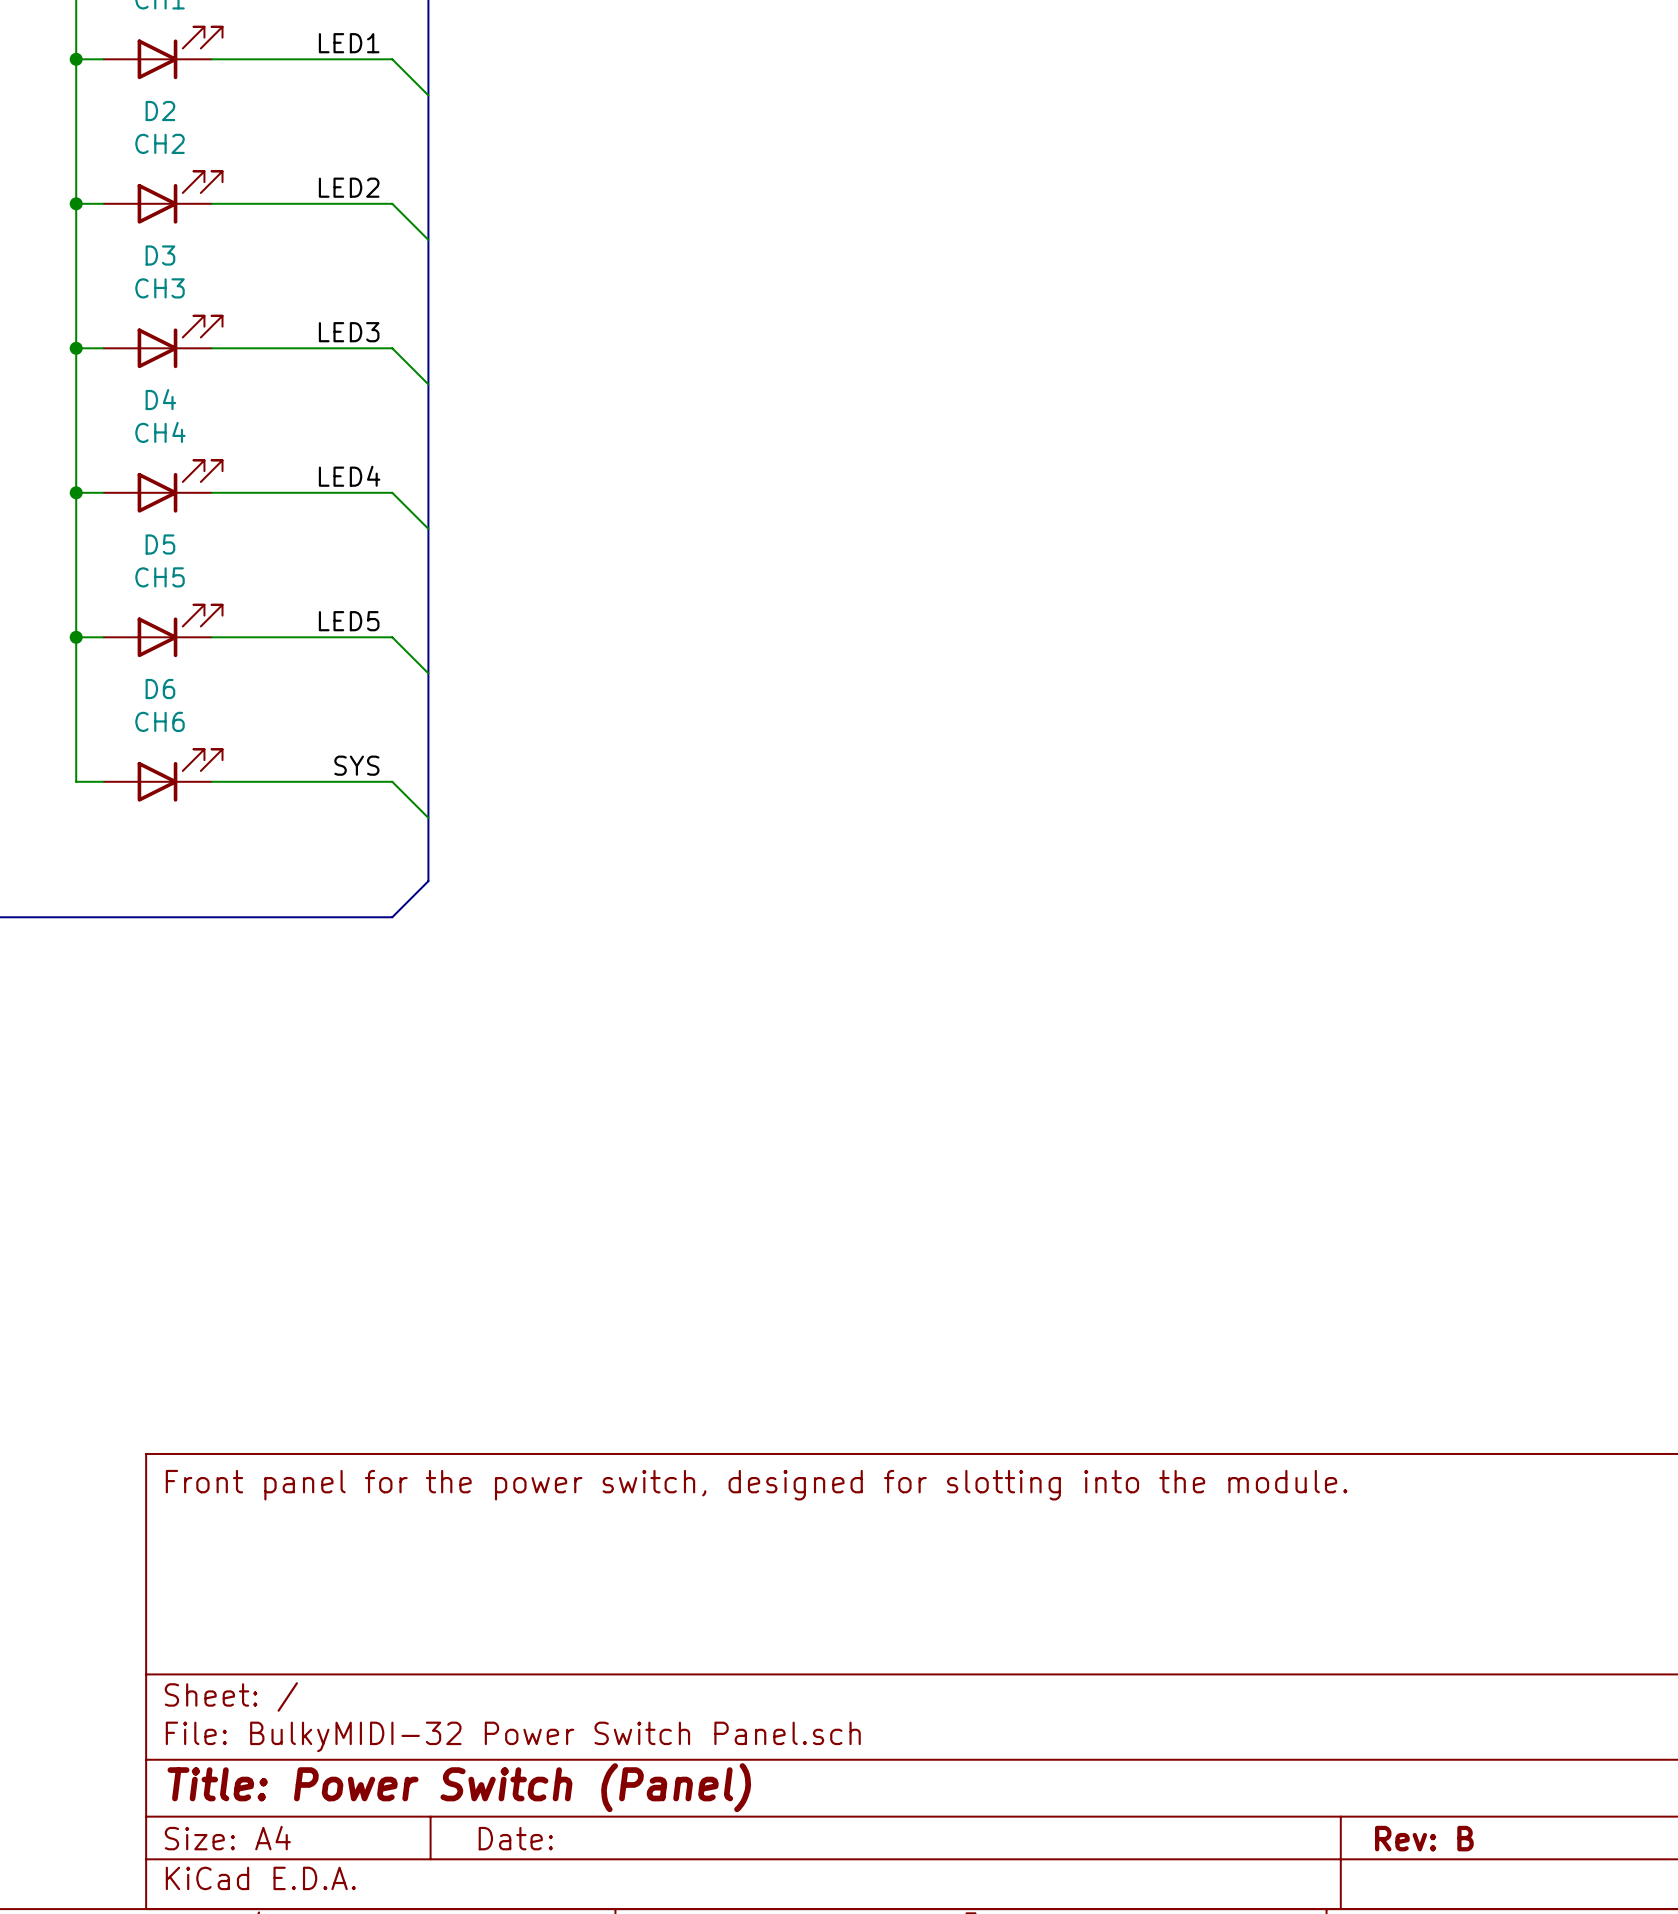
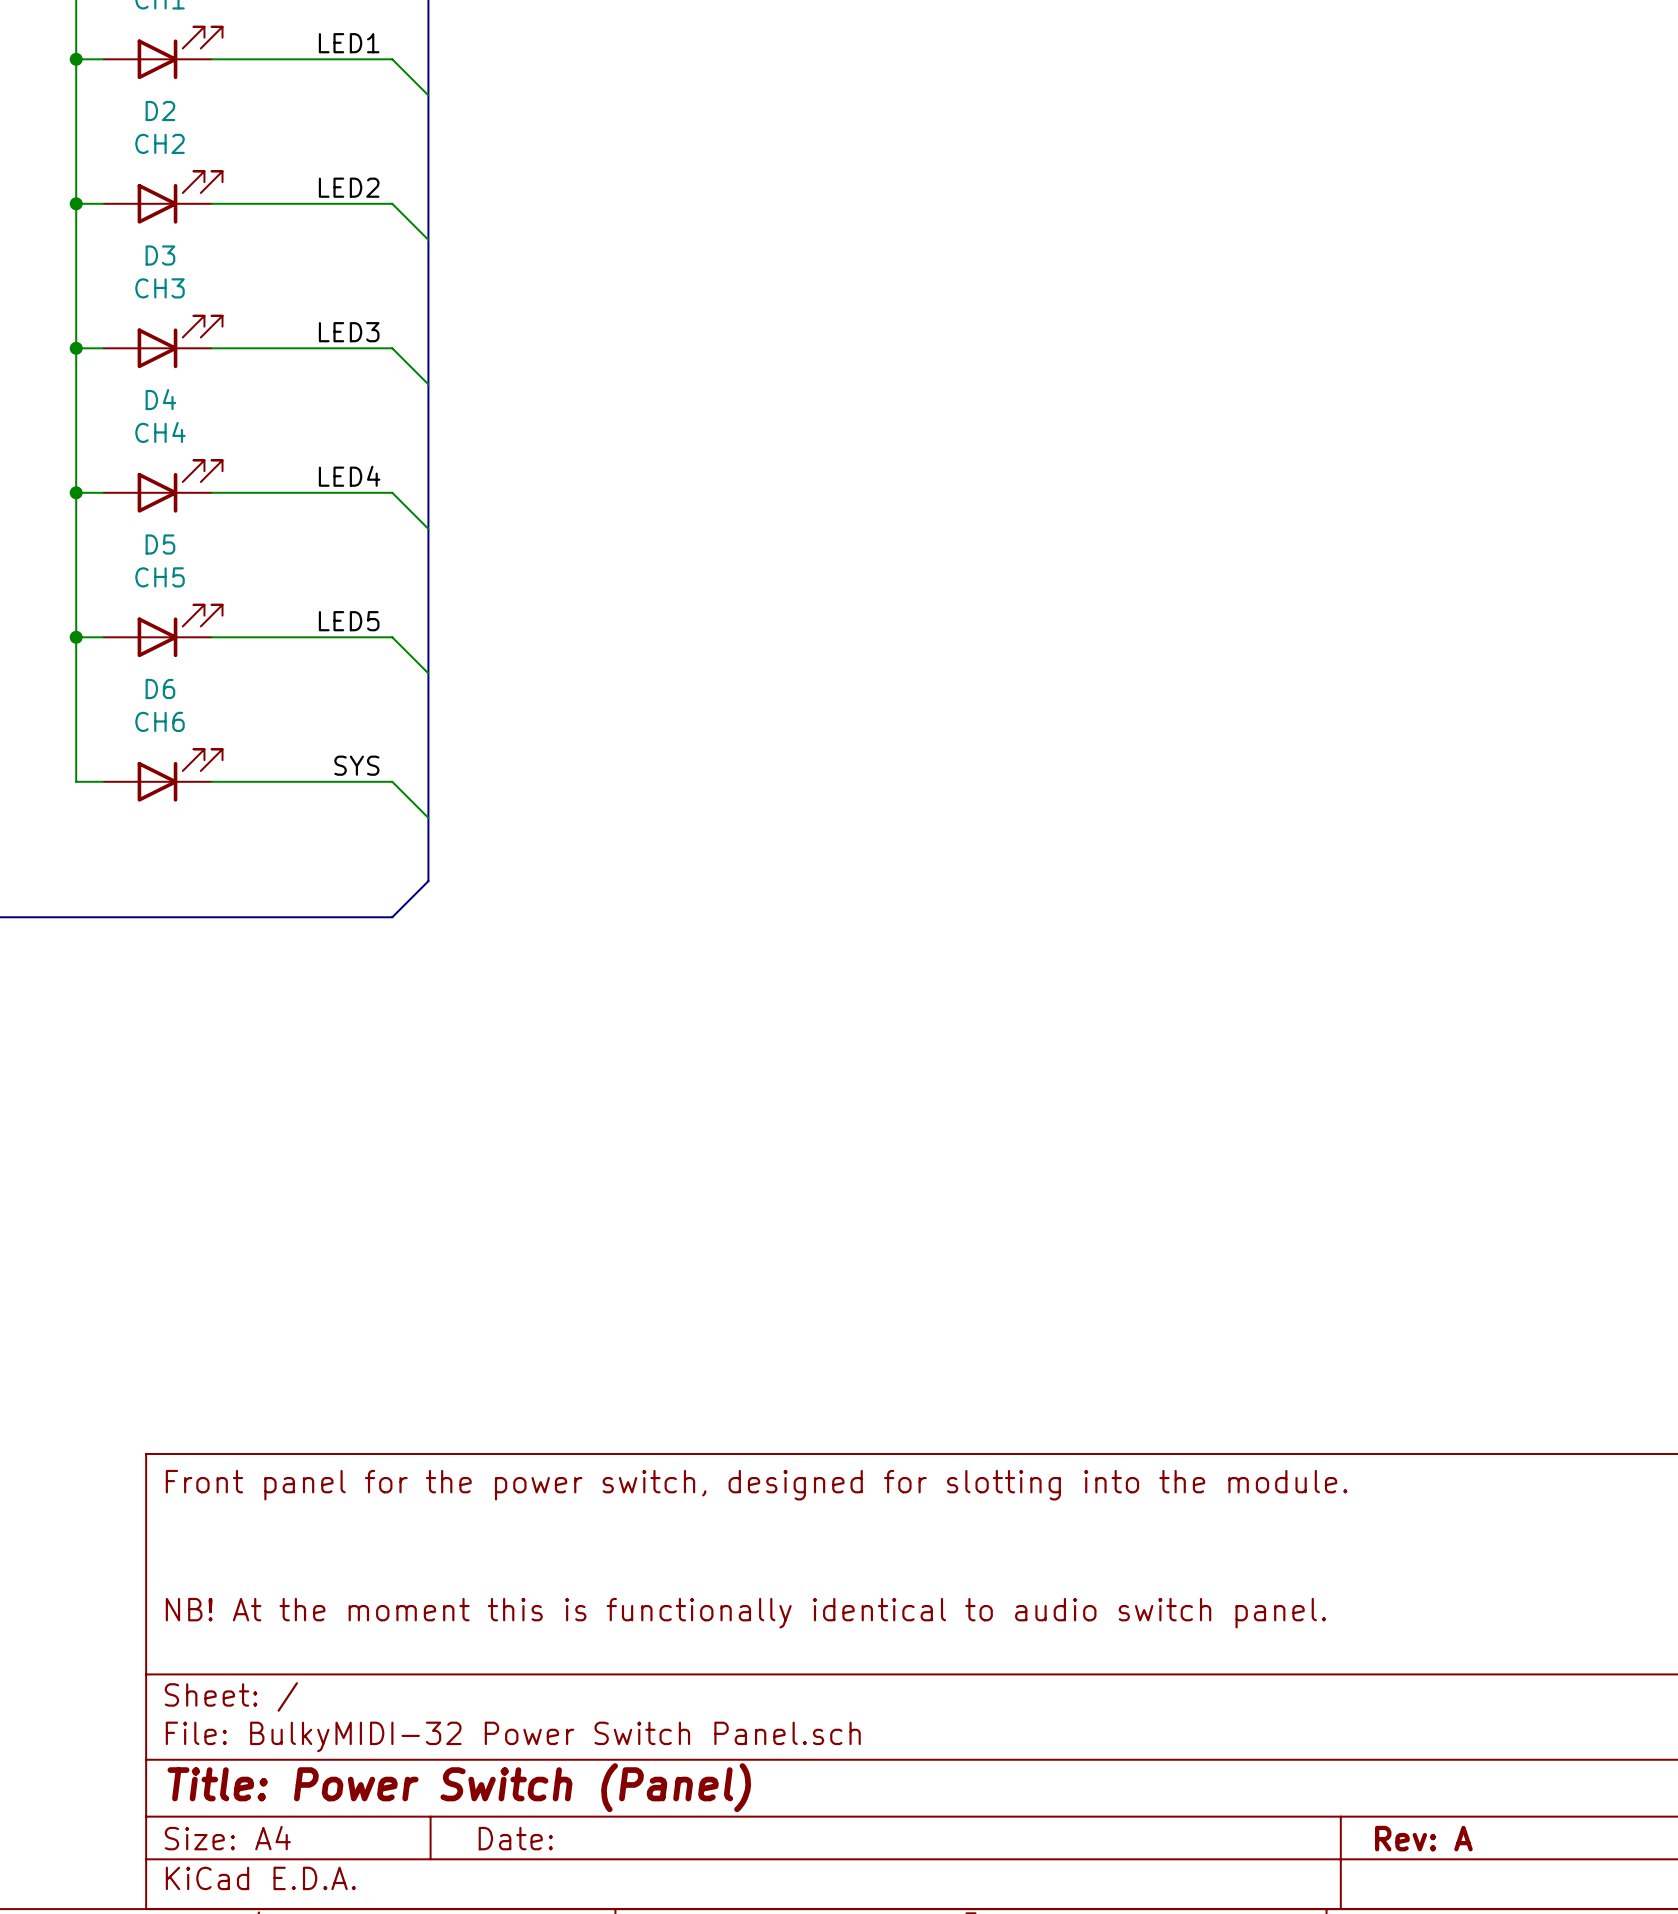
title block: none -> NB! At the moment this is functionally identical to audio switch panel. (745, 1613)
title block: Rev: B (1424, 1838) -> Rev: A (1423, 1838)

